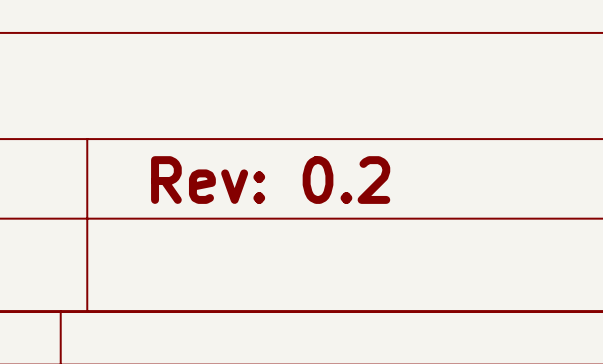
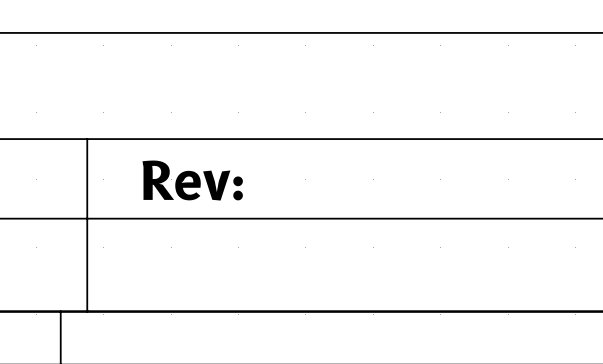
title block: Rev: 0.2 (270, 180) -> Rev: (192, 180)

